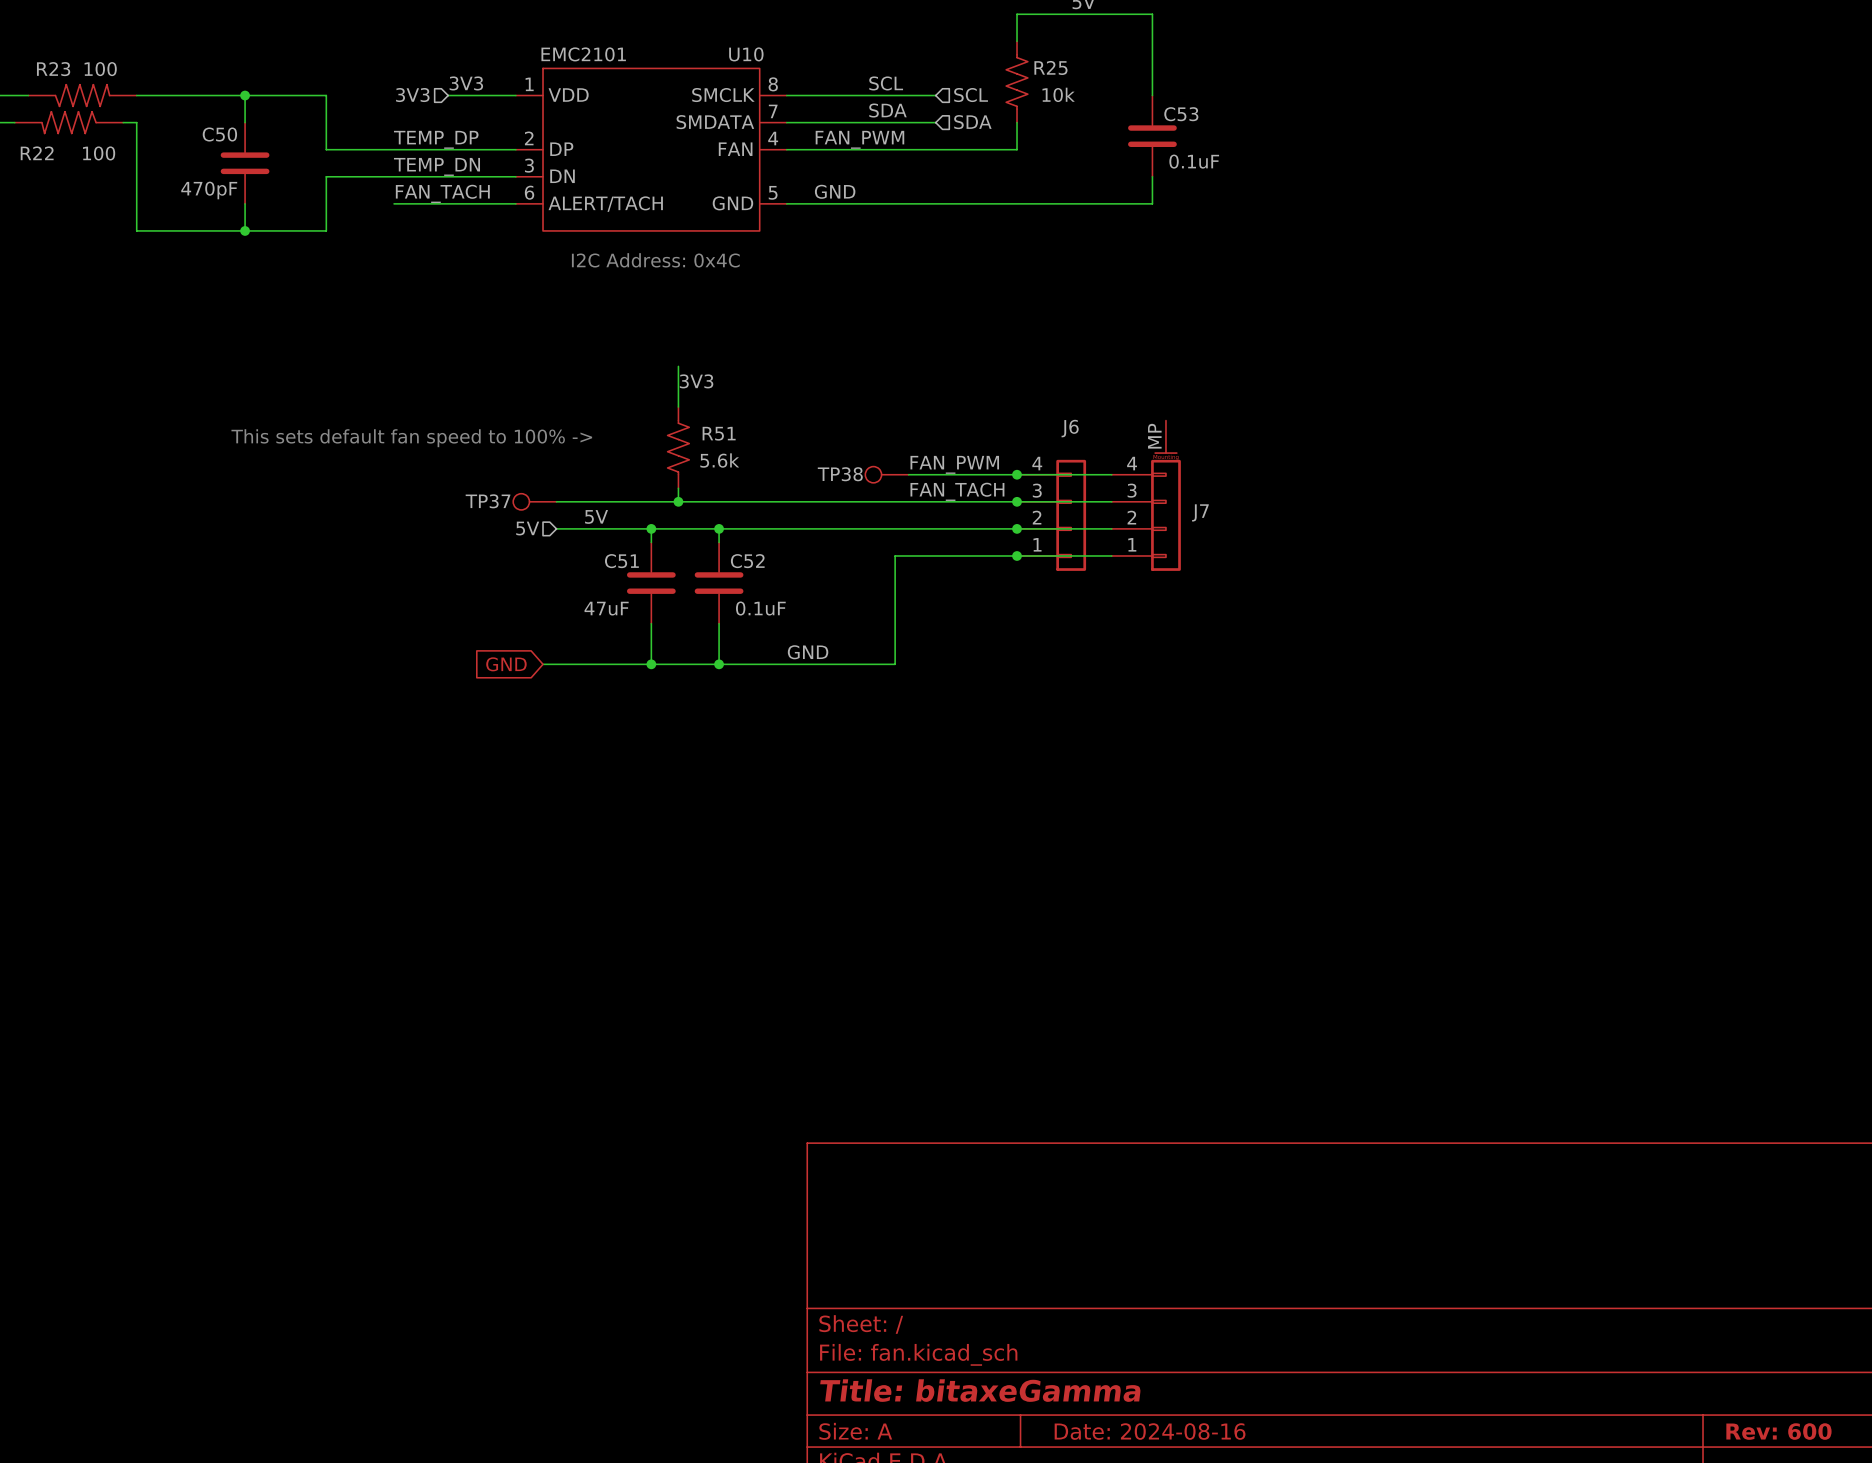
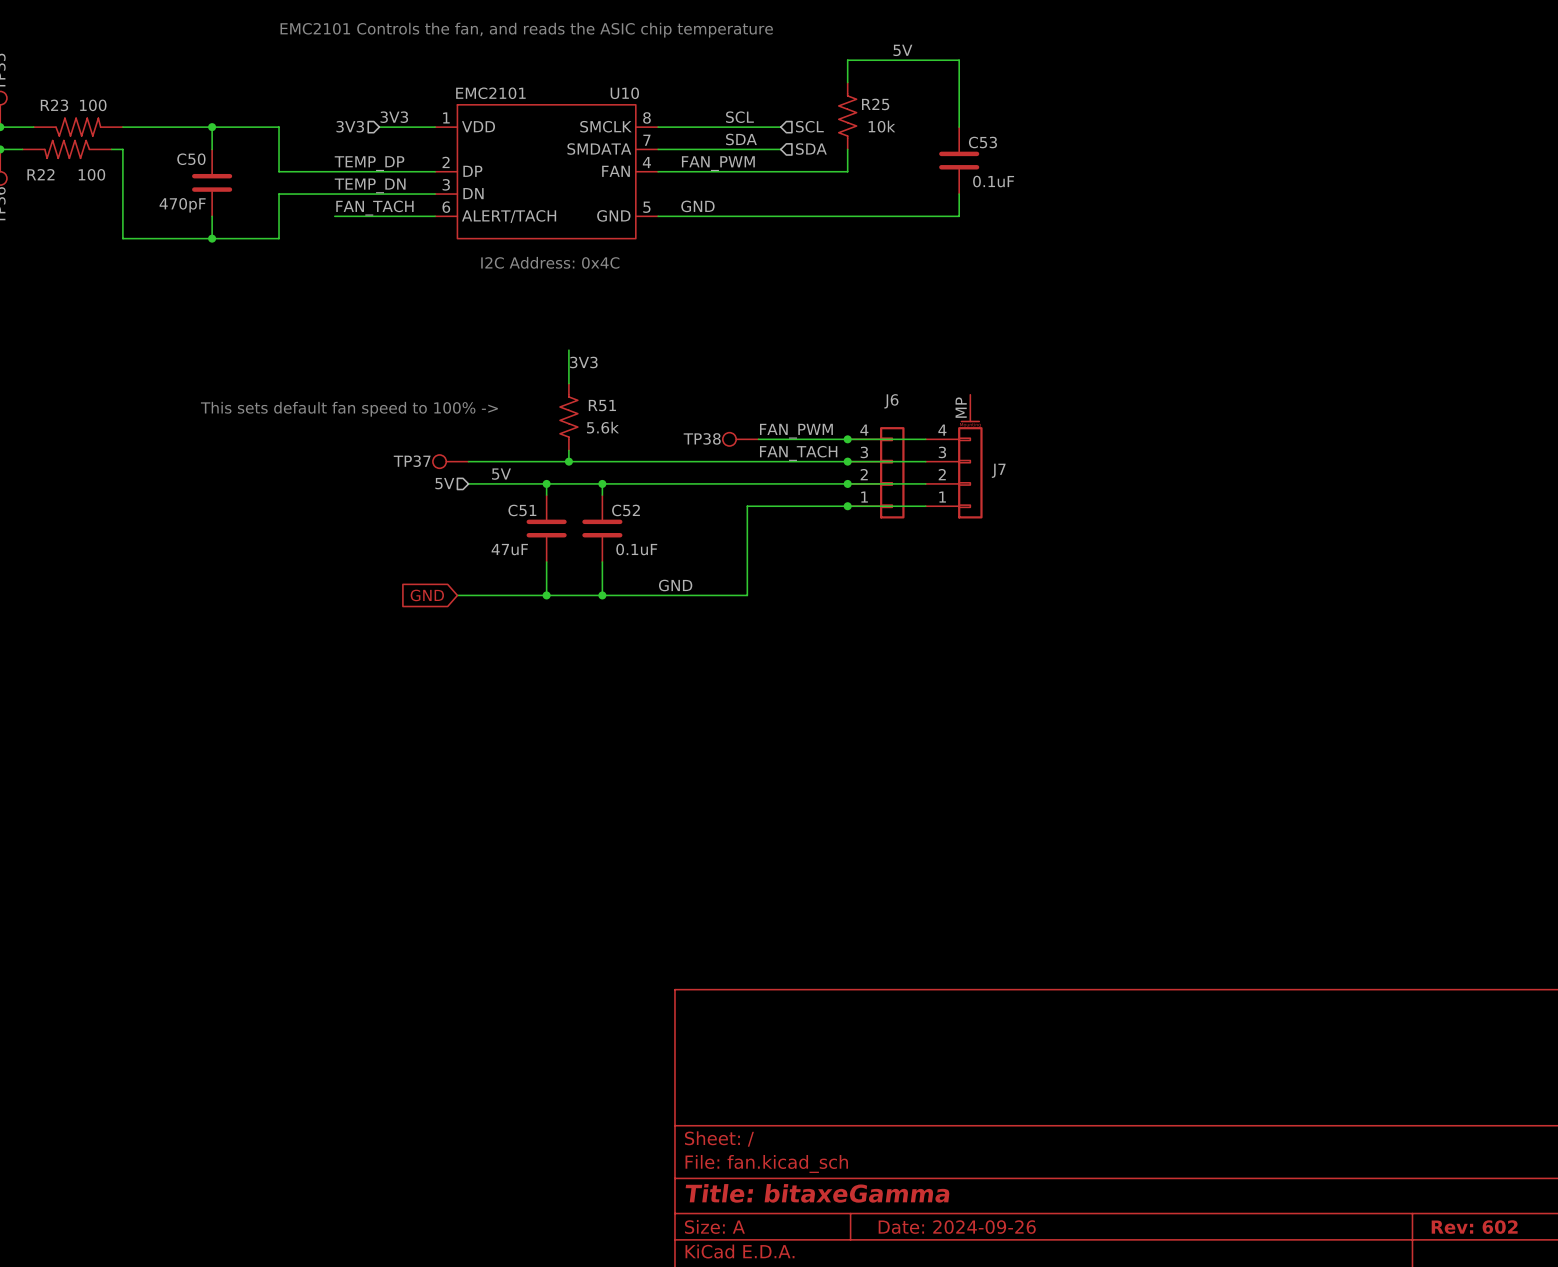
title block: Date: 2024-08-16 (1150, 1431) -> Date: 2024-09-26 (957, 1227)
title block: Rev: 600 (1778, 1431) -> Rev: 602 (1474, 1227)

